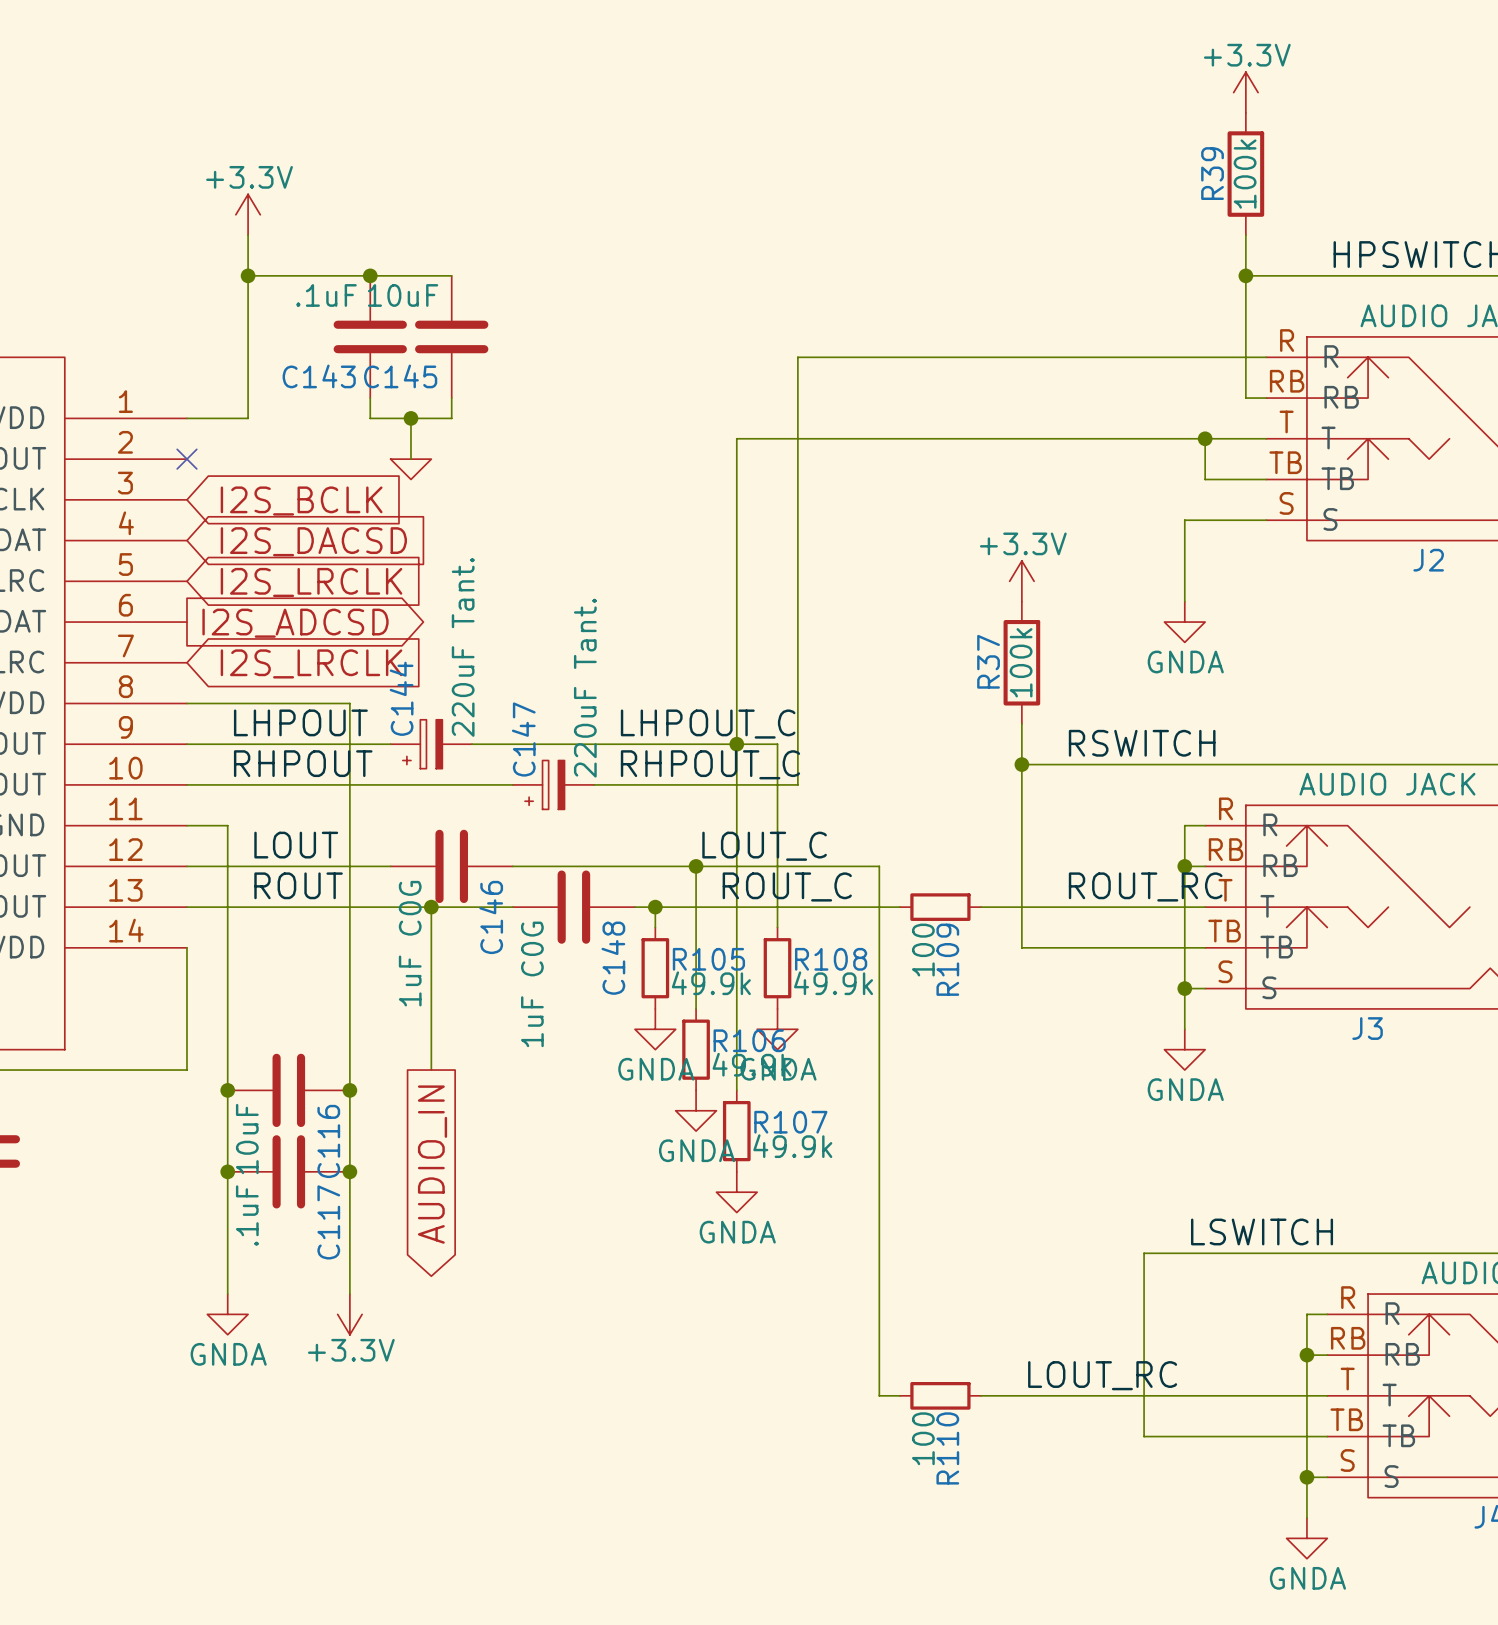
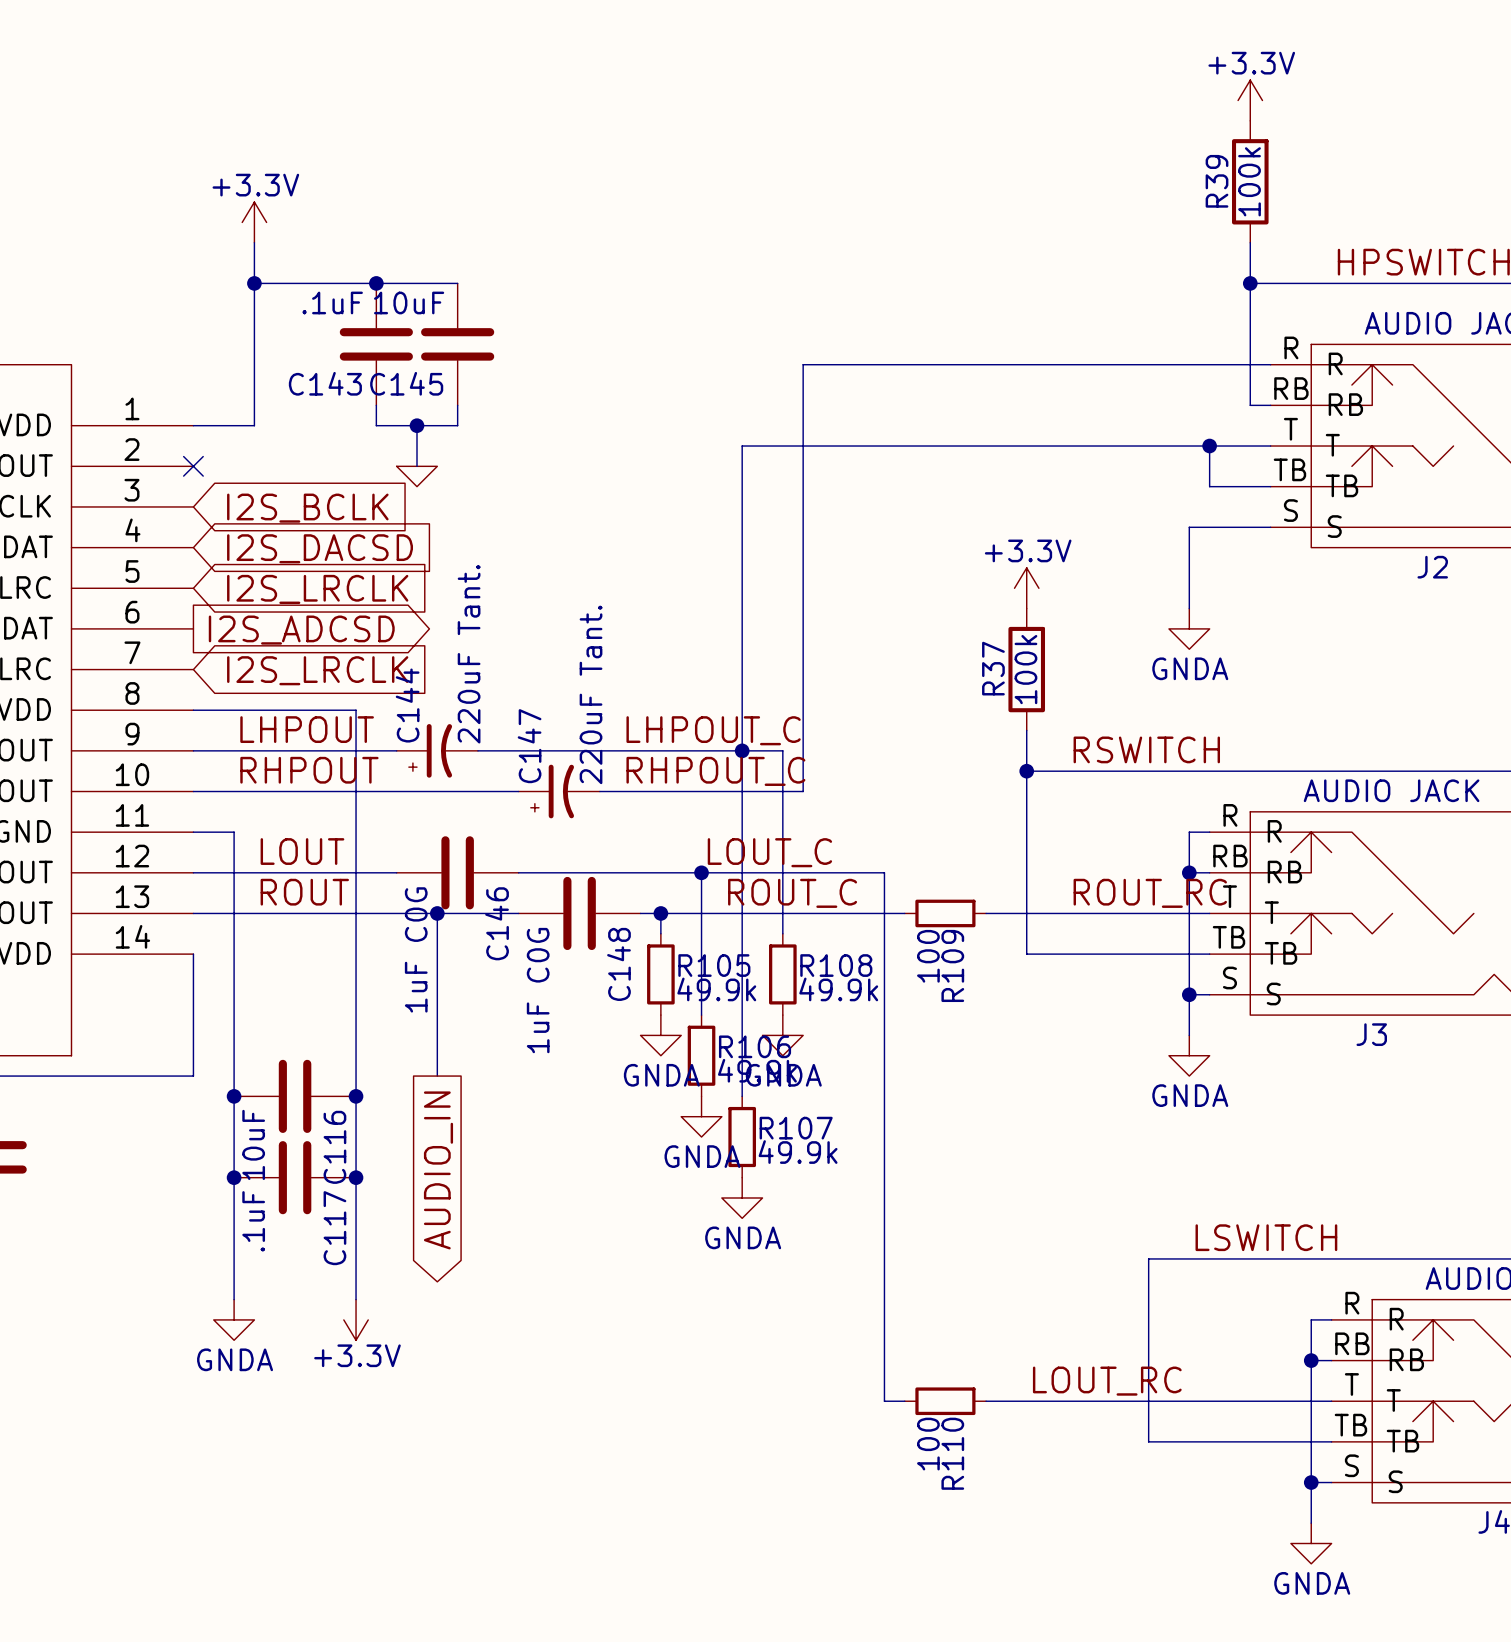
C144 symbol: [390, 719, 473, 769] -> [396, 724, 478, 778]
C147 symbol: [512, 760, 595, 810] -> [518, 764, 600, 819]

